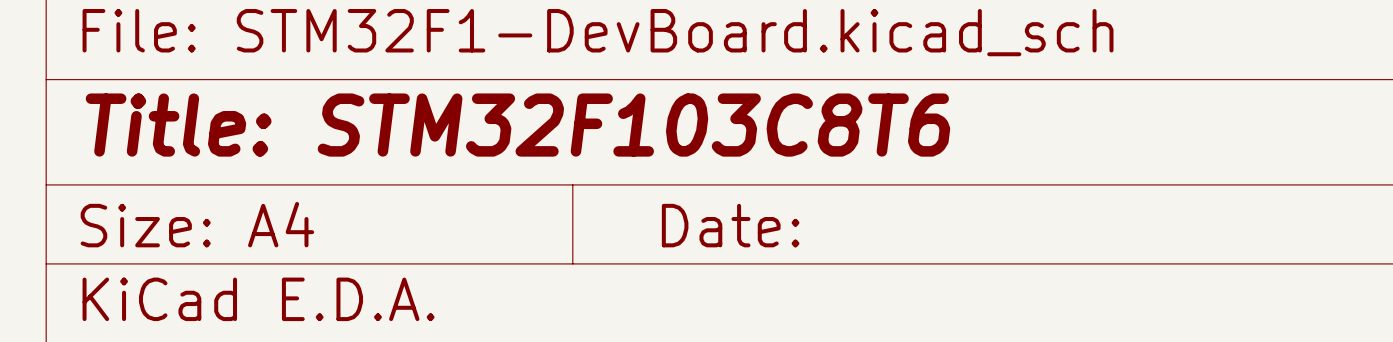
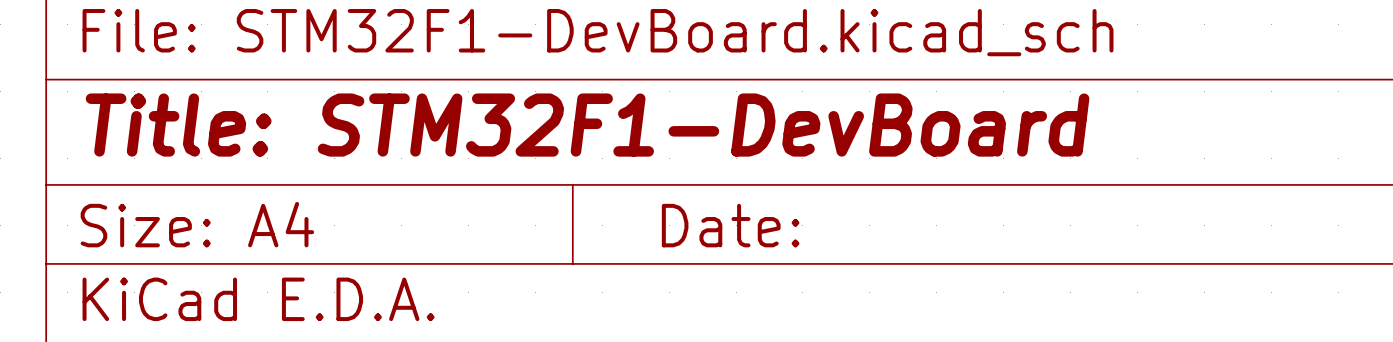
title block: Title: STM32F103C8T6 (517, 125) -> Title: STM32F1-DevBoard (587, 125)

